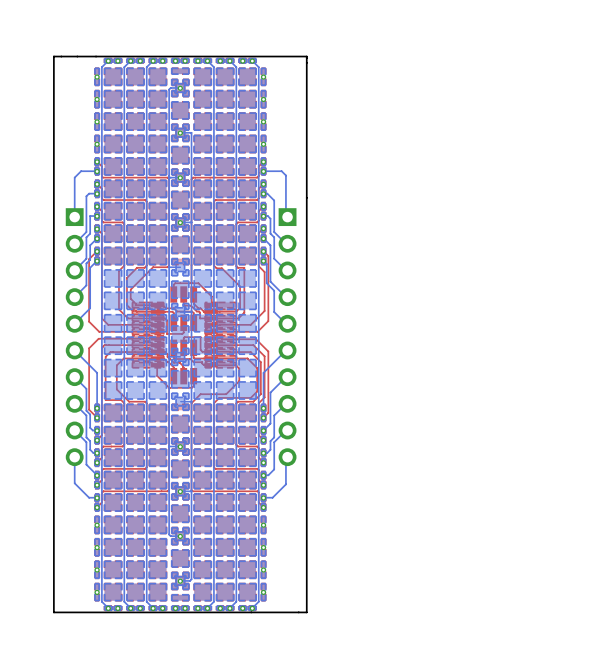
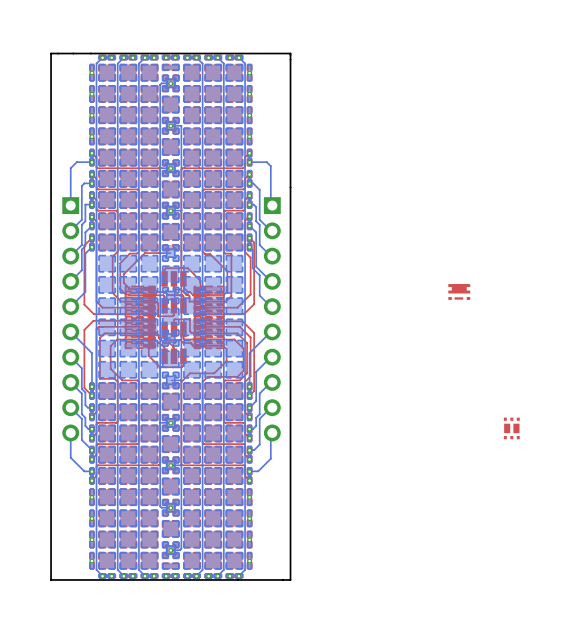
part: none -> (459, 292)
part: none -> (511, 428)

